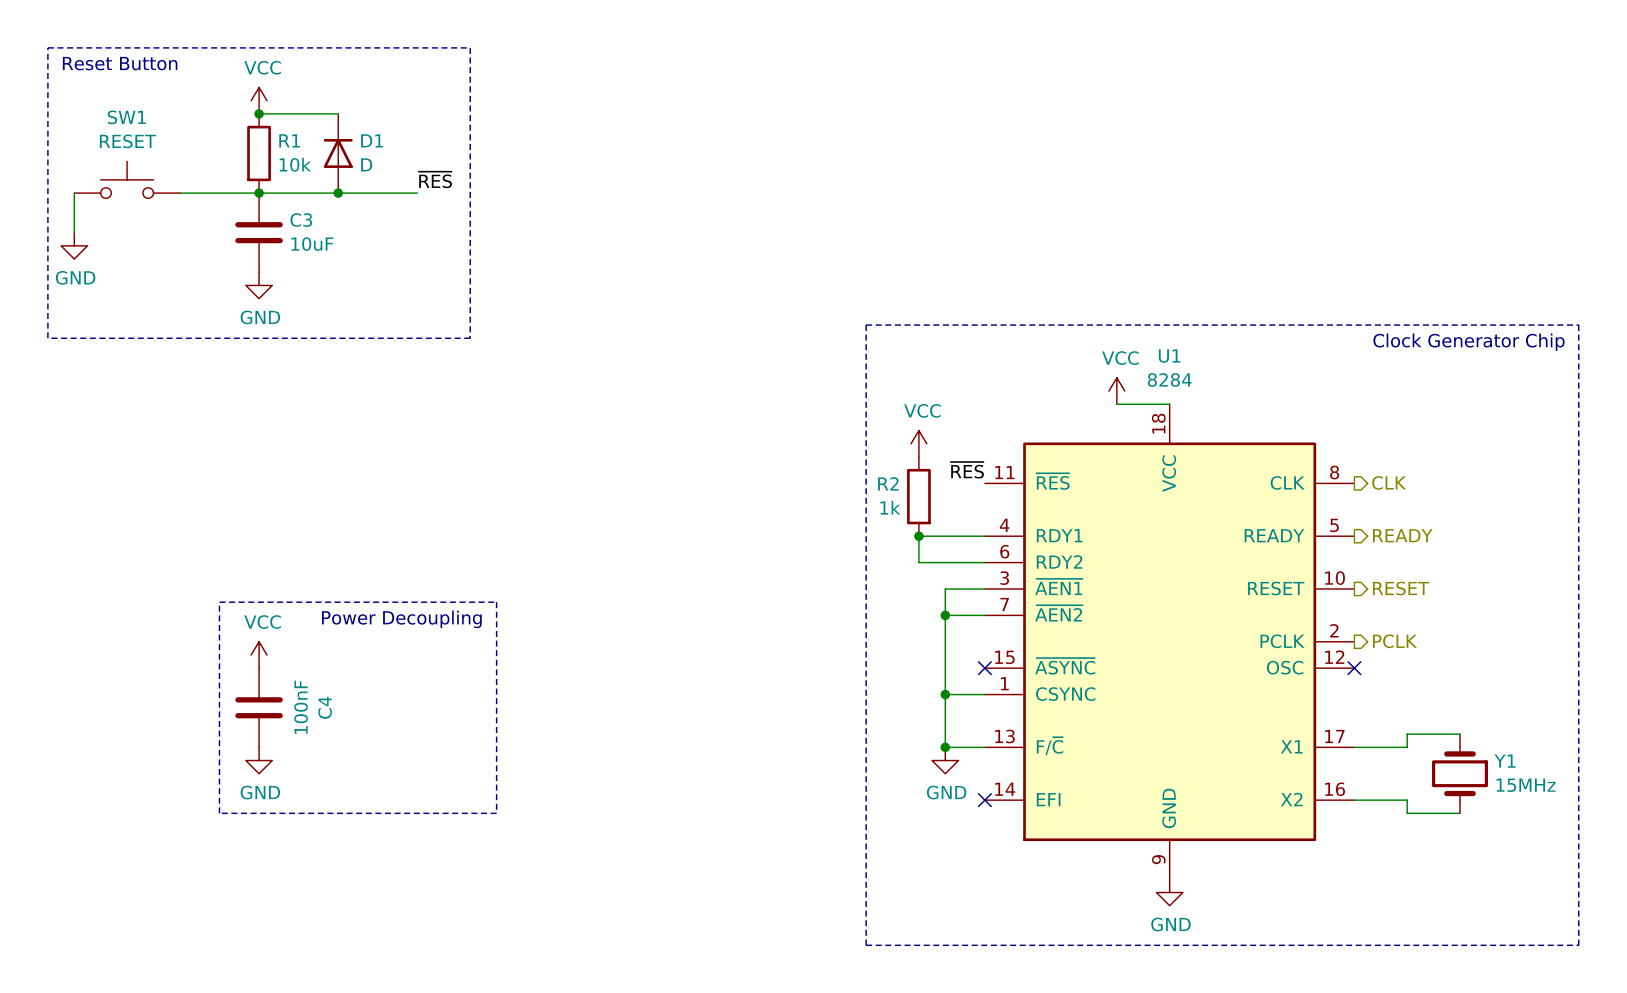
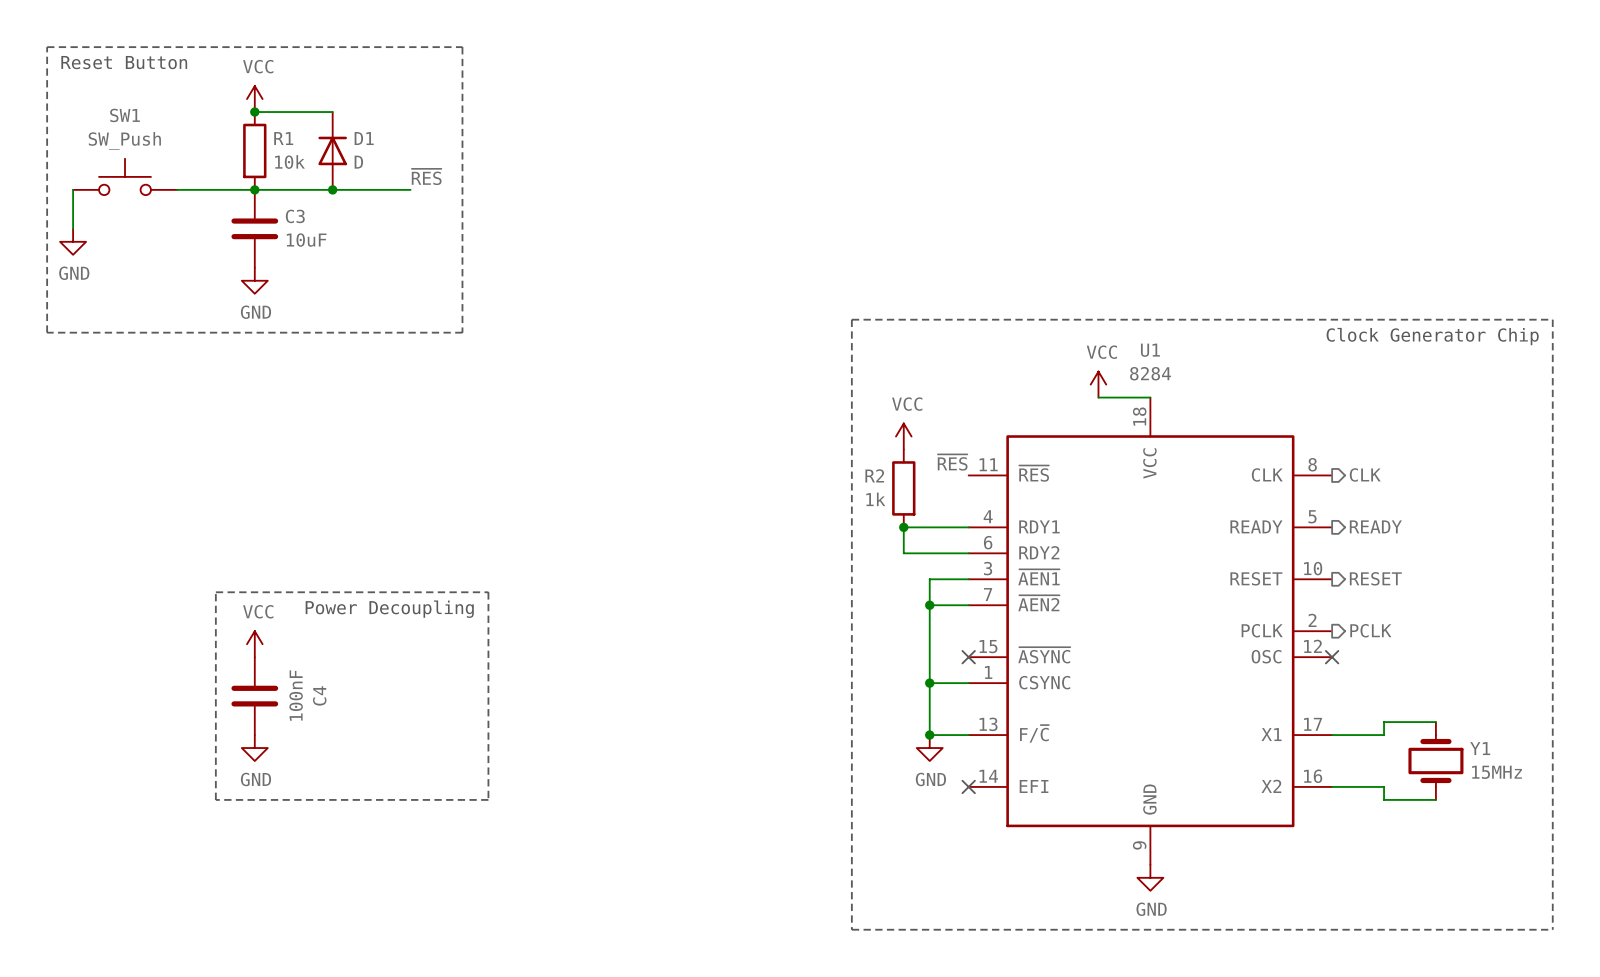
SW1 value: RESET (128, 141) -> SW_Push (124, 140)

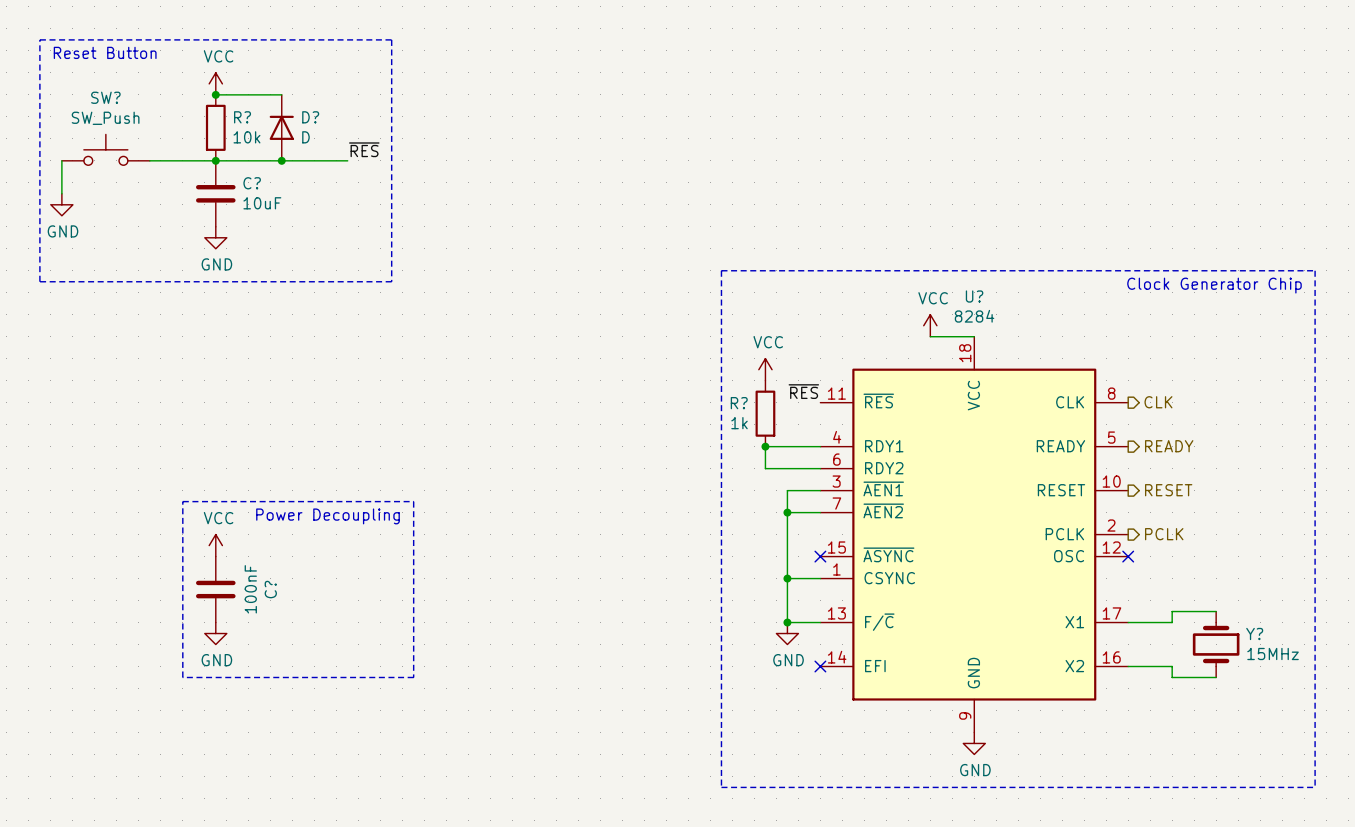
SW1 name: SW1 (125, 115) -> SW? (105, 97)
R1 name: R1 (283, 138) -> R? (242, 117)
D1 name: D1 (364, 138) -> D? (310, 117)
C3 name: C3 (295, 216) -> C? (252, 183)
U1 name: U1 (1150, 350) -> U? (974, 296)
R2 name: R2 (874, 475) -> R? (739, 403)
C4 name: C4 (319, 695) -> C? (270, 589)
Y1 name: Y1 (1480, 748) -> Y? (1254, 633)

